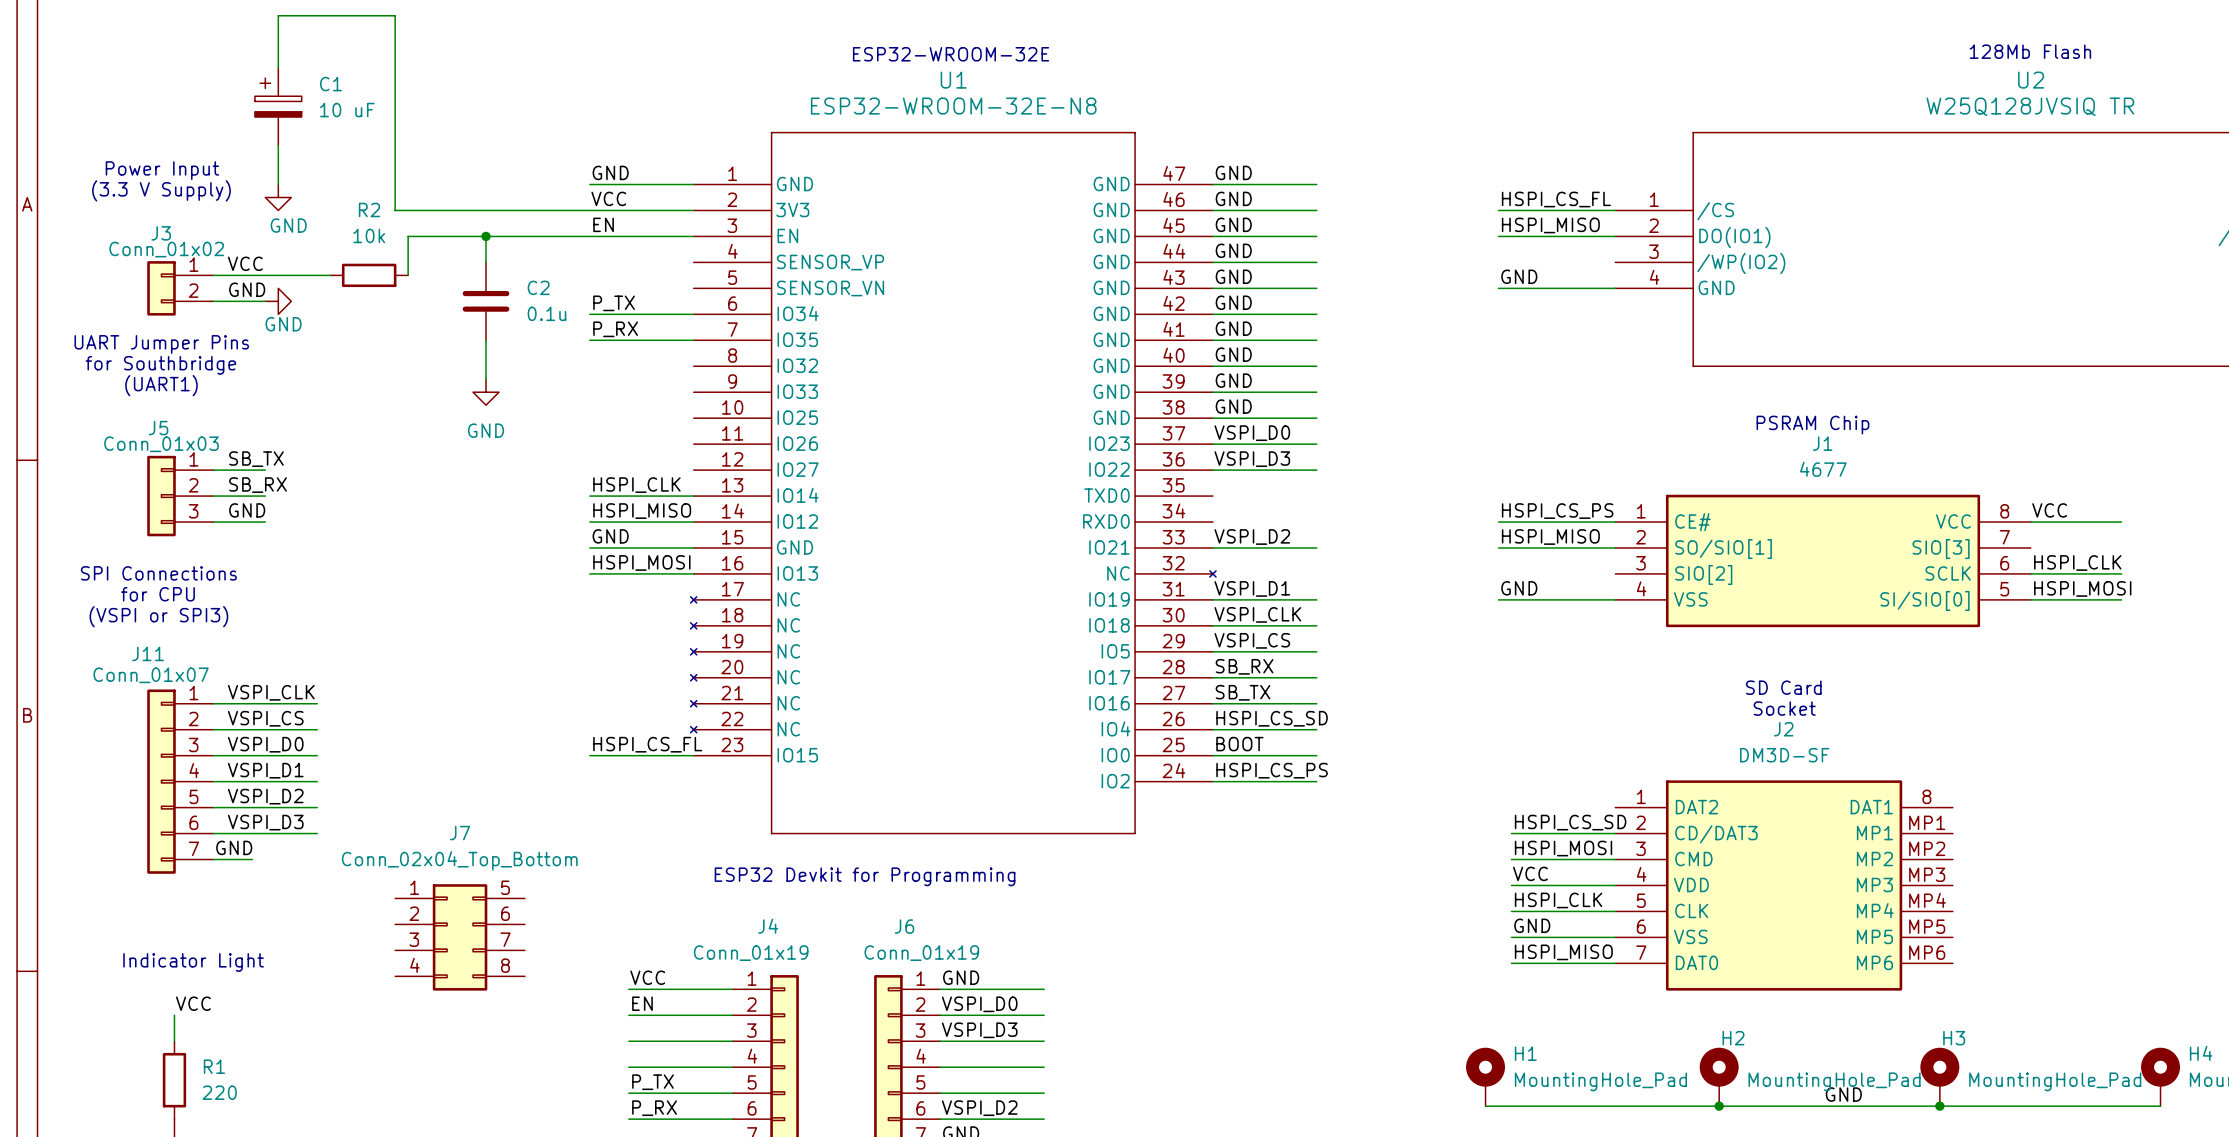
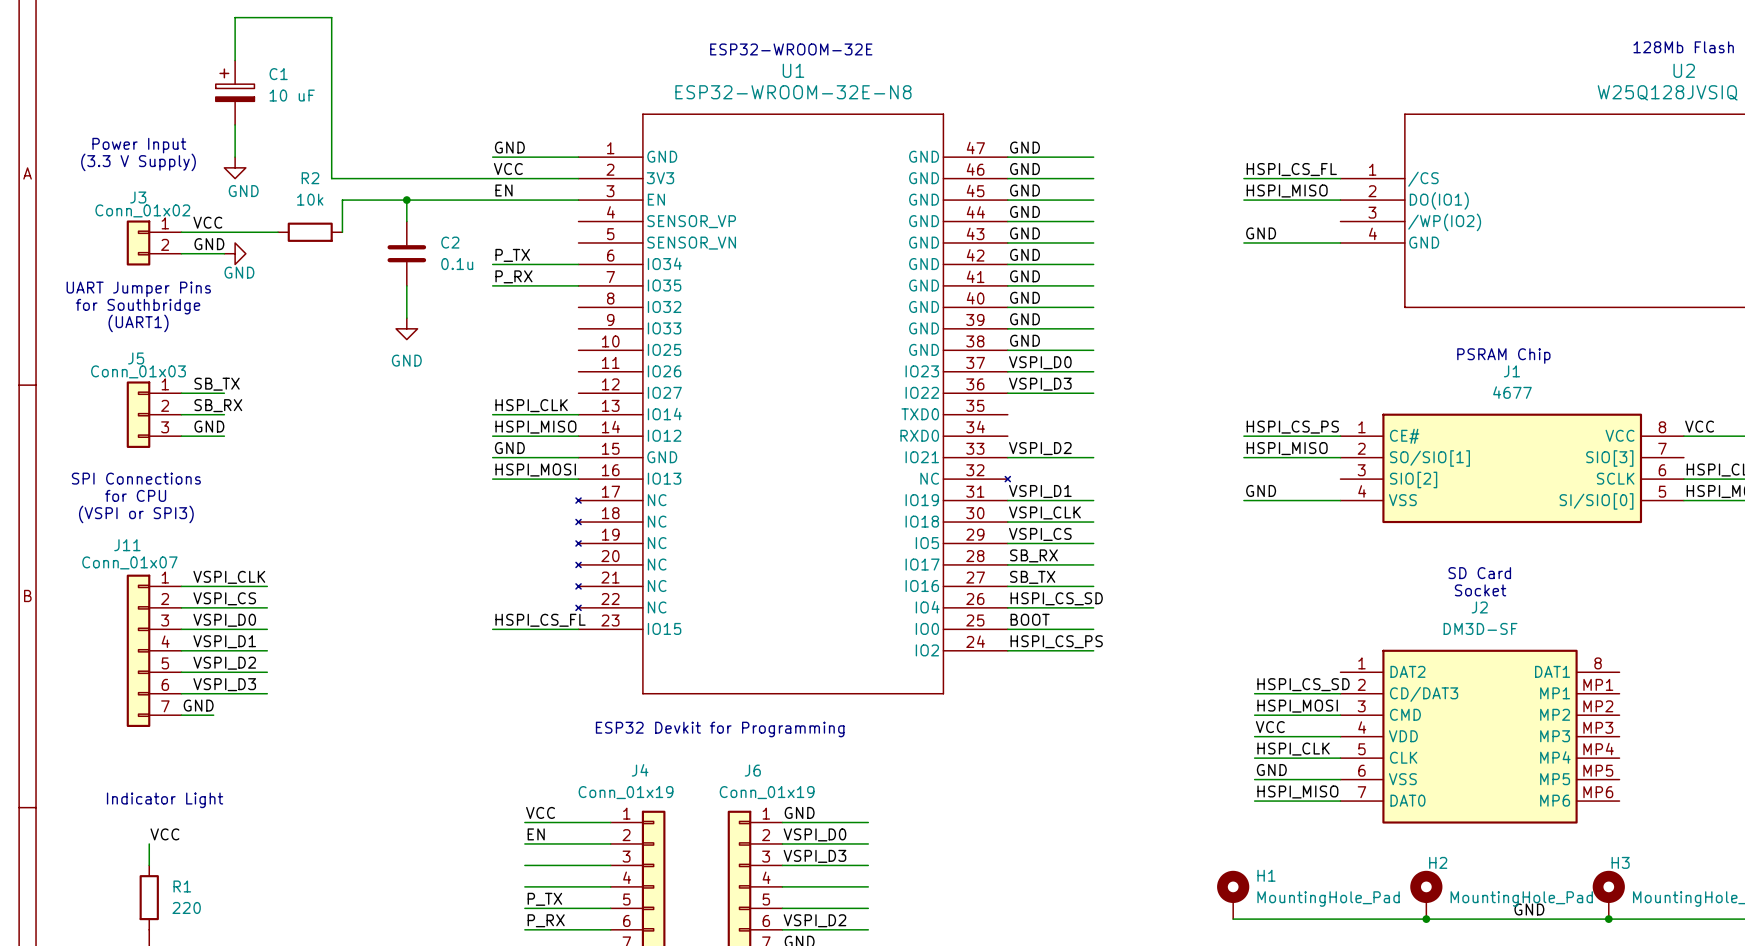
J7: Conn_02x04_Top_Bottom (460, 937) -> none

